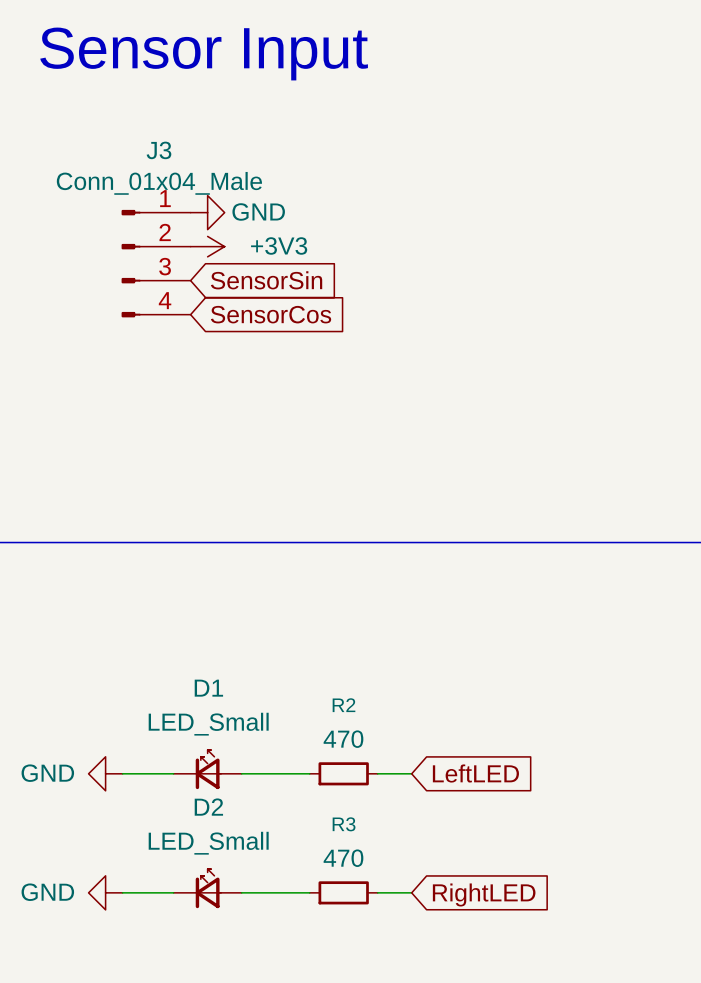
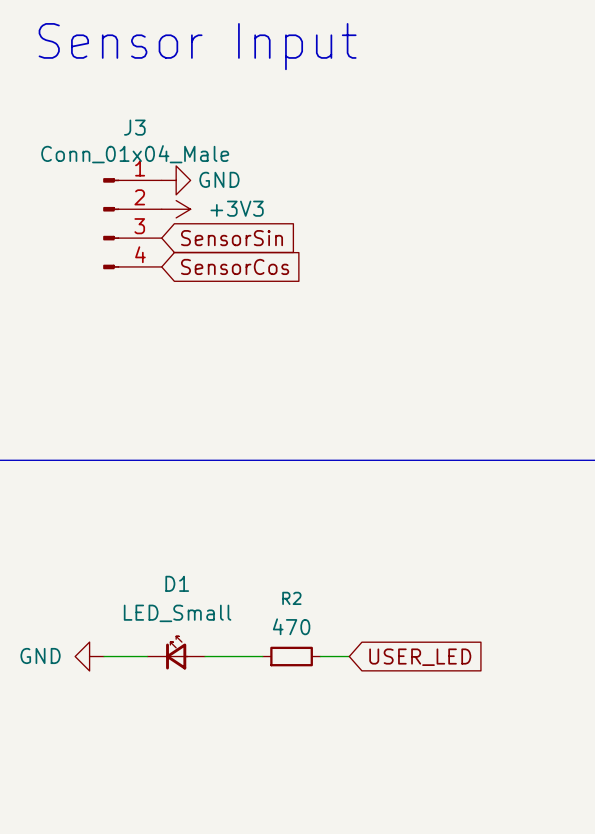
global label: LeftLED (475, 773) -> USER_LED (420, 657)
D2: LED_Small (207, 888) -> none
power symbol: GND (105, 892) -> none
wire: (122, 892) (173, 892) -> none
wire: (241, 892) (309, 892) -> none
R3: 470 (343, 892) -> none
wire: (377, 892) (411, 892) -> none
global label: RightLED (484, 894) -> none

